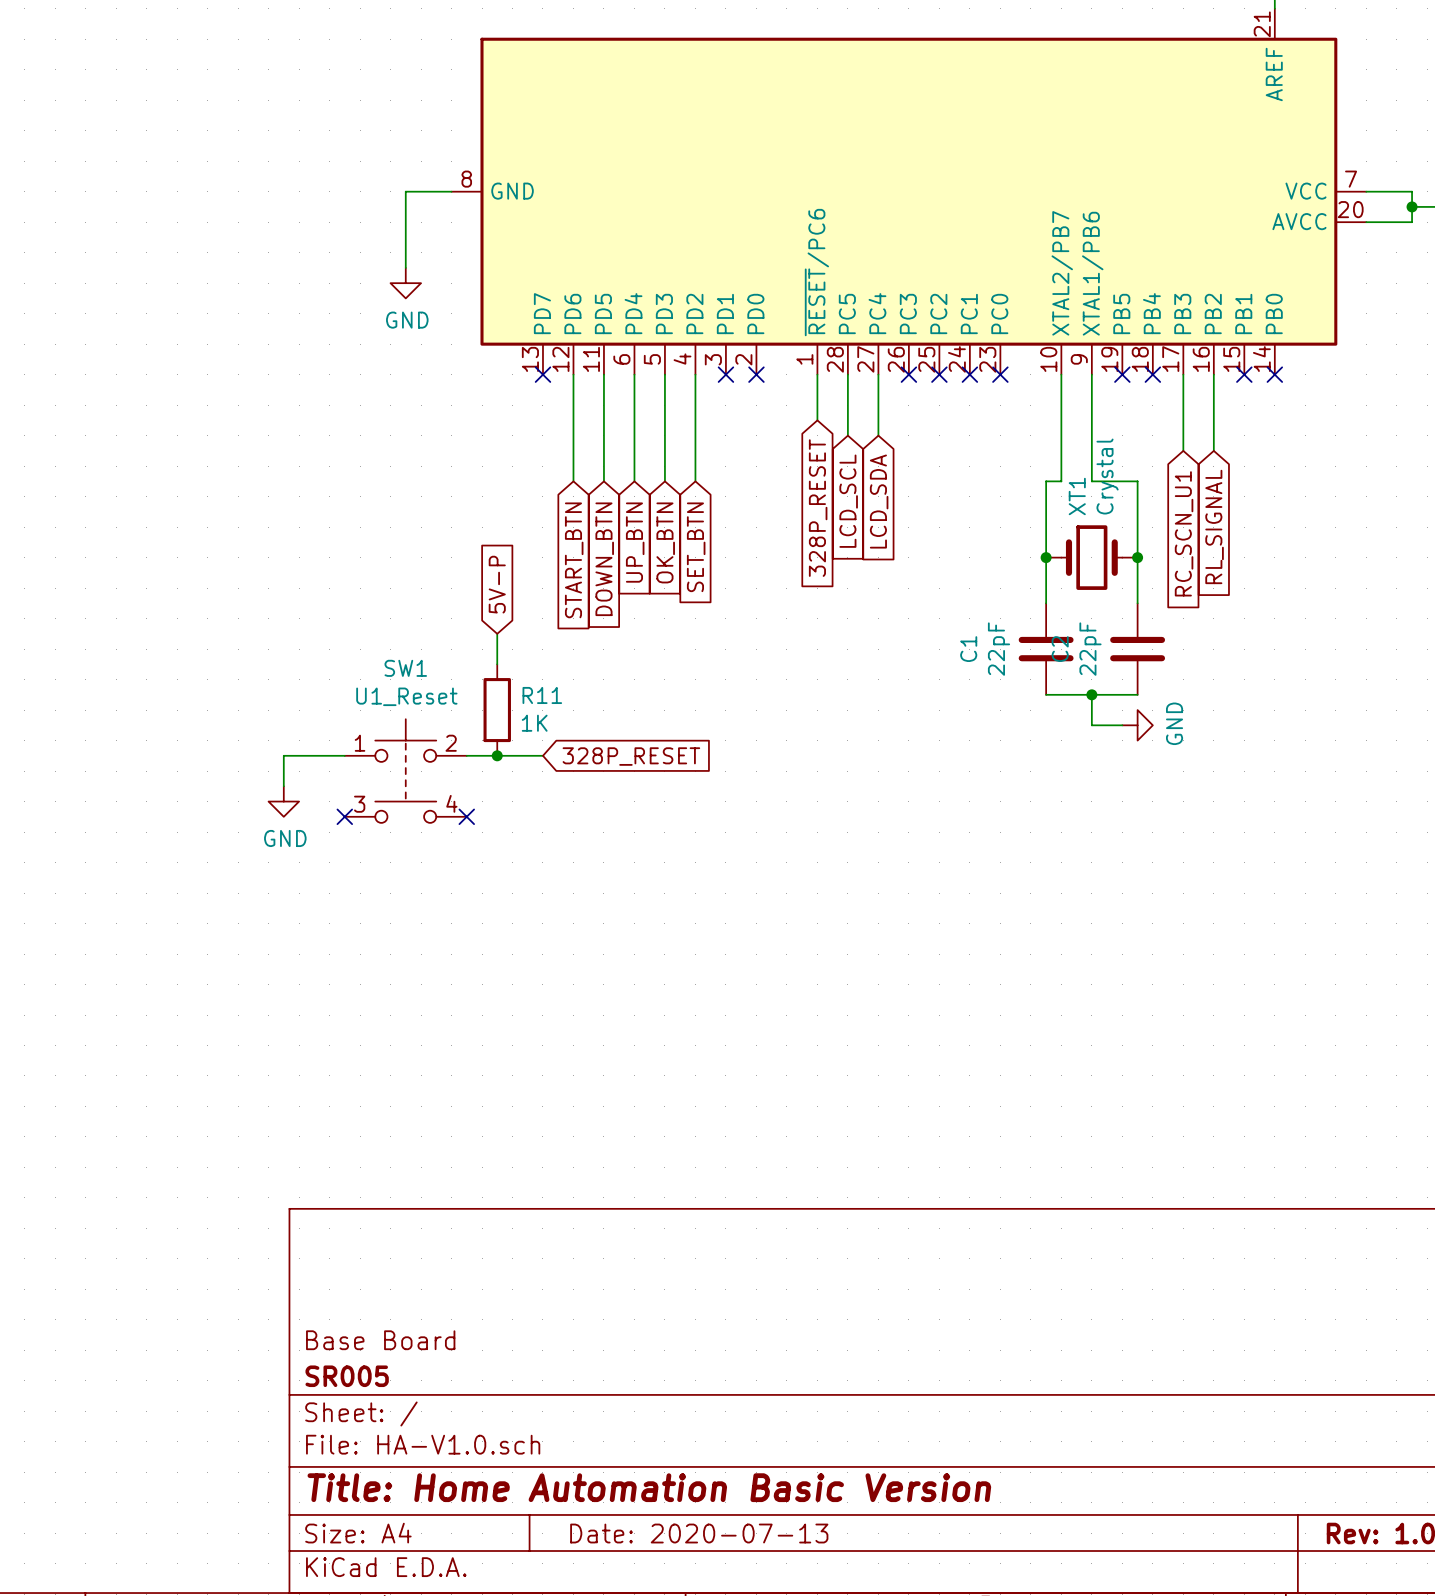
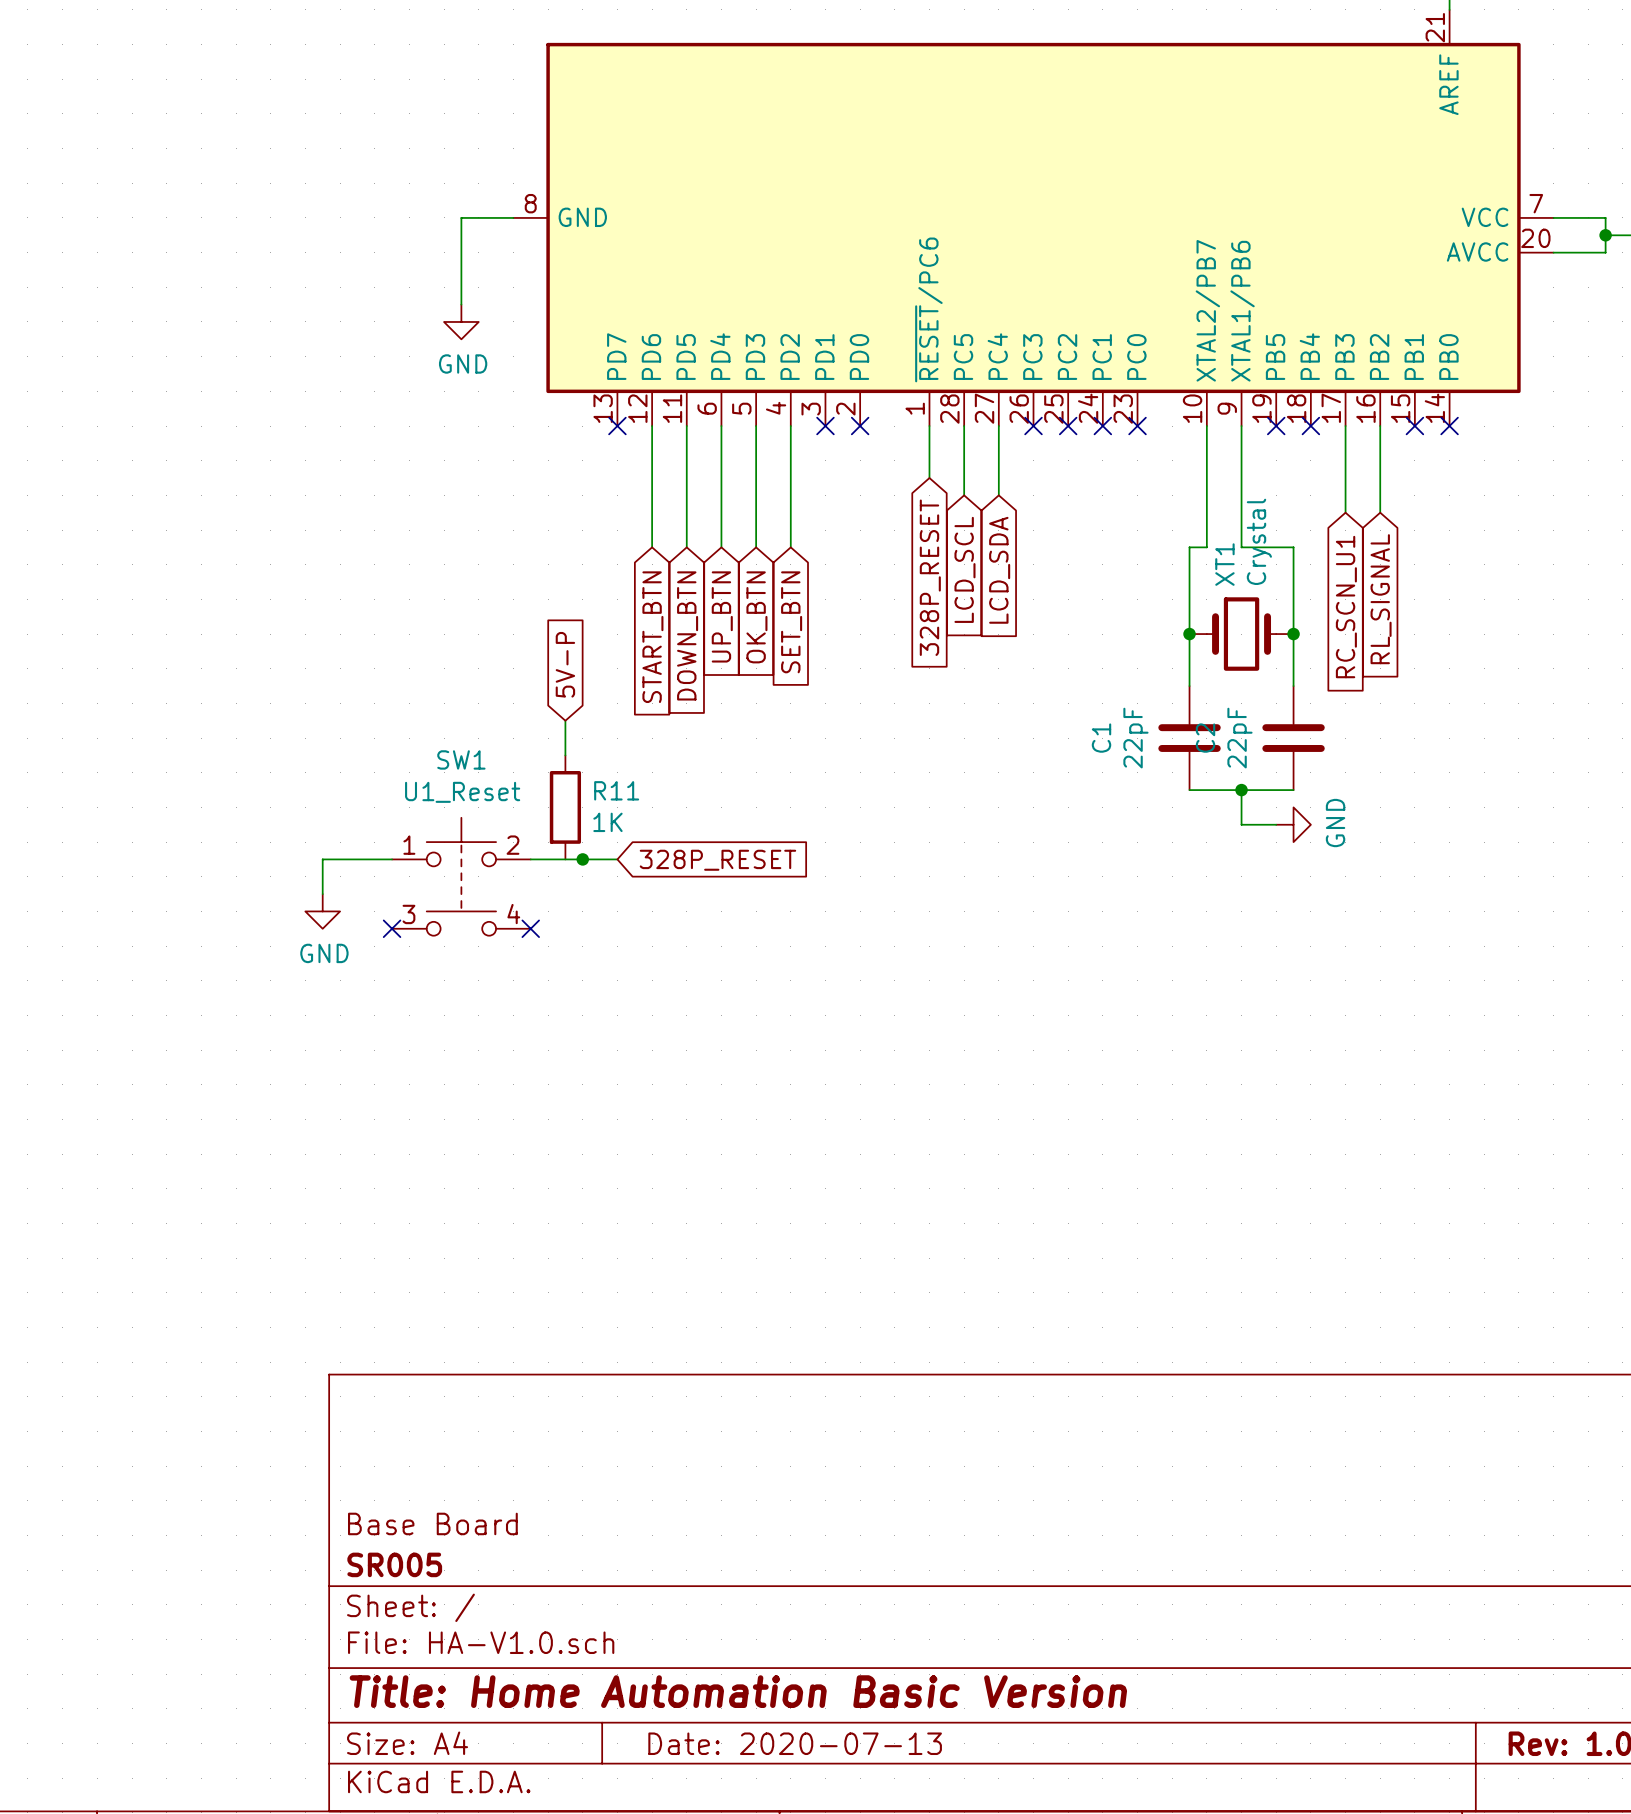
junction position: (497, 755) -> (582, 859)

